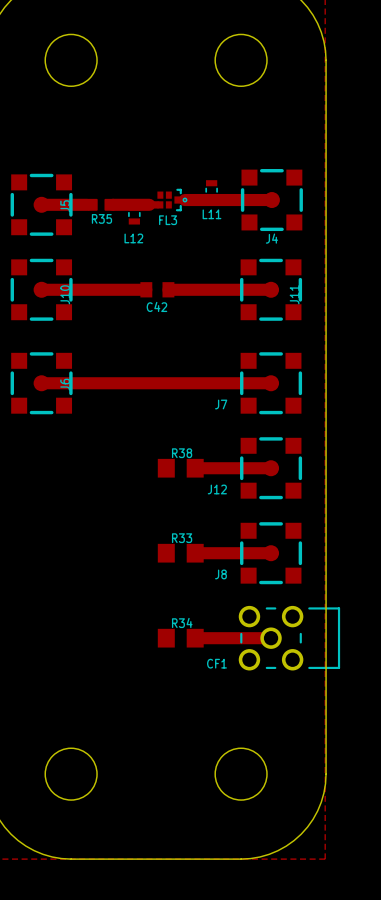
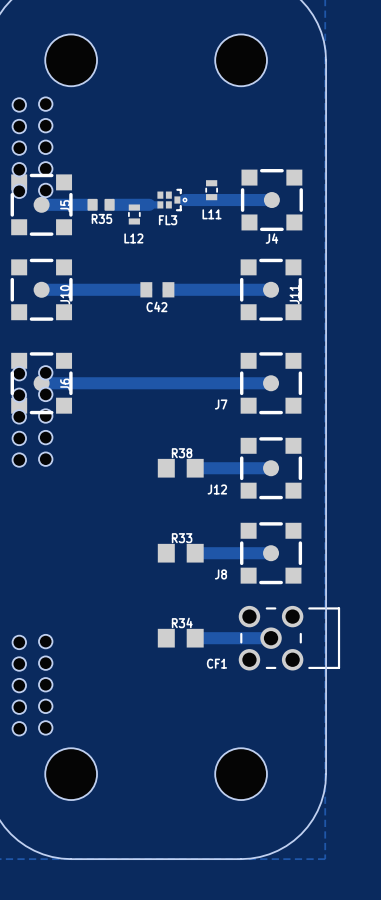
hole: none -> (19, 104)
hole: none -> (45, 104)
hole: none -> (45, 125)
hole: none -> (19, 126)
hole: none -> (45, 147)
hole: none -> (19, 148)
hole: none -> (45, 168)
hole: none -> (19, 169)
hole: none -> (45, 190)
hole: none -> (19, 191)
hole: none -> (45, 372)
hole: none -> (19, 373)
hole: none -> (45, 394)
hole: none -> (19, 395)
hole: none -> (19, 416)
hole: none -> (45, 416)
hole: none -> (45, 437)
hole: none -> (19, 438)
hole: none -> (45, 459)
hole: none -> (19, 460)
hole: none -> (45, 641)
hole: none -> (19, 642)
hole: none -> (45, 663)
hole: none -> (19, 664)
hole: none -> (45, 684)
hole: none -> (19, 685)
hole: none -> (45, 706)
hole: none -> (19, 707)
hole: none -> (45, 727)
hole: none -> (19, 728)

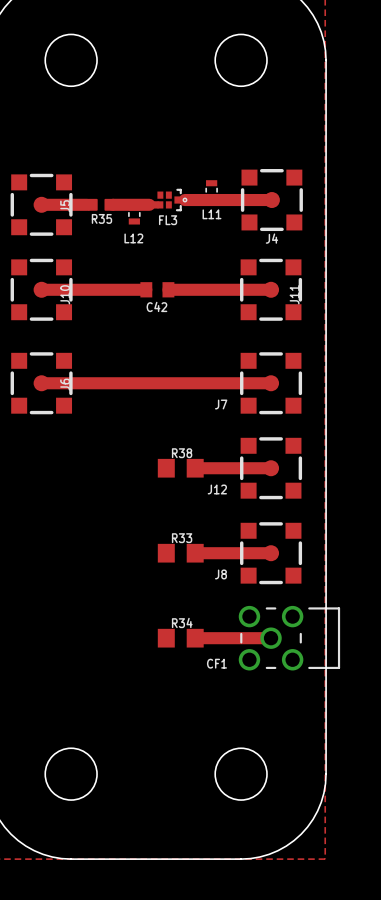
hole: (19, 104) -> none
hole: (45, 104) -> none
hole: (45, 125) -> none
hole: (19, 126) -> none
hole: (45, 147) -> none
hole: (19, 148) -> none
hole: (45, 168) -> none
hole: (19, 169) -> none
hole: (45, 190) -> none
hole: (19, 191) -> none
hole: (45, 372) -> none
hole: (19, 373) -> none
hole: (45, 394) -> none
hole: (19, 395) -> none
hole: (19, 416) -> none
hole: (45, 416) -> none
hole: (45, 437) -> none
hole: (19, 438) -> none
hole: (45, 459) -> none
hole: (19, 460) -> none
hole: (45, 641) -> none
hole: (19, 642) -> none
hole: (45, 663) -> none
hole: (19, 664) -> none
hole: (45, 684) -> none
hole: (19, 685) -> none
hole: (45, 706) -> none
hole: (19, 707) -> none
hole: (45, 727) -> none
hole: (19, 728) -> none

